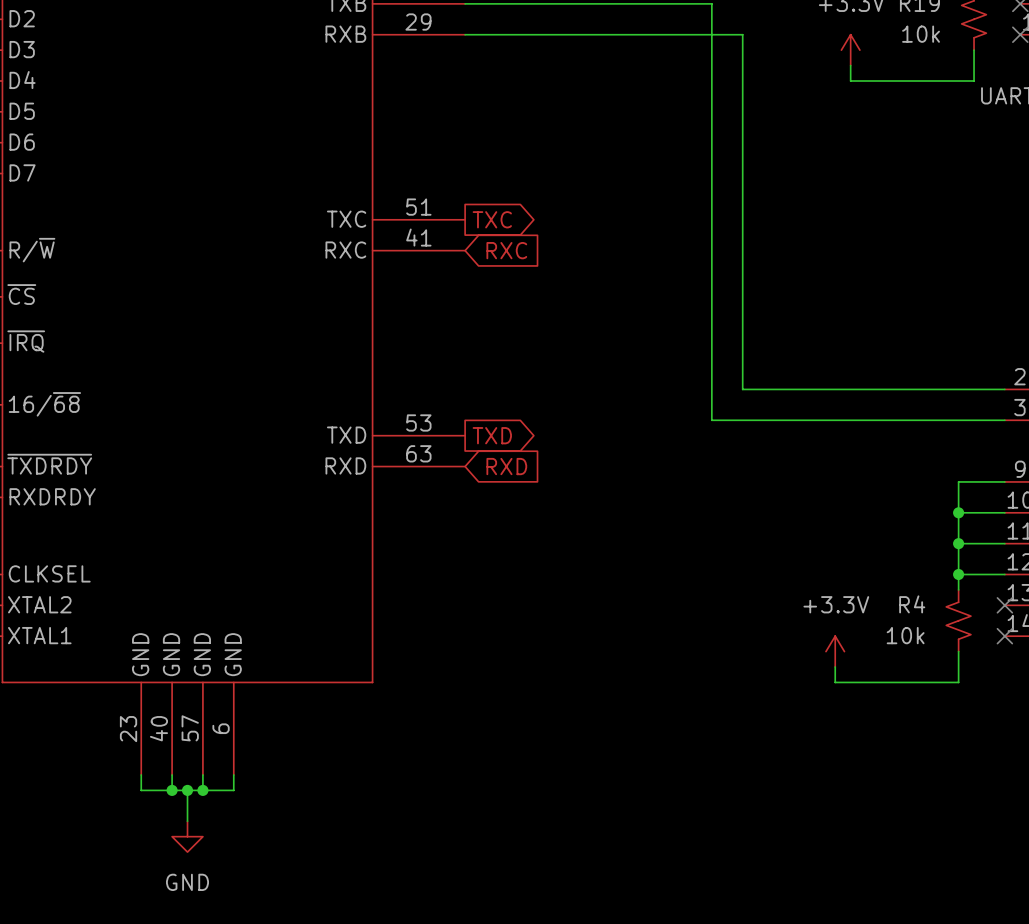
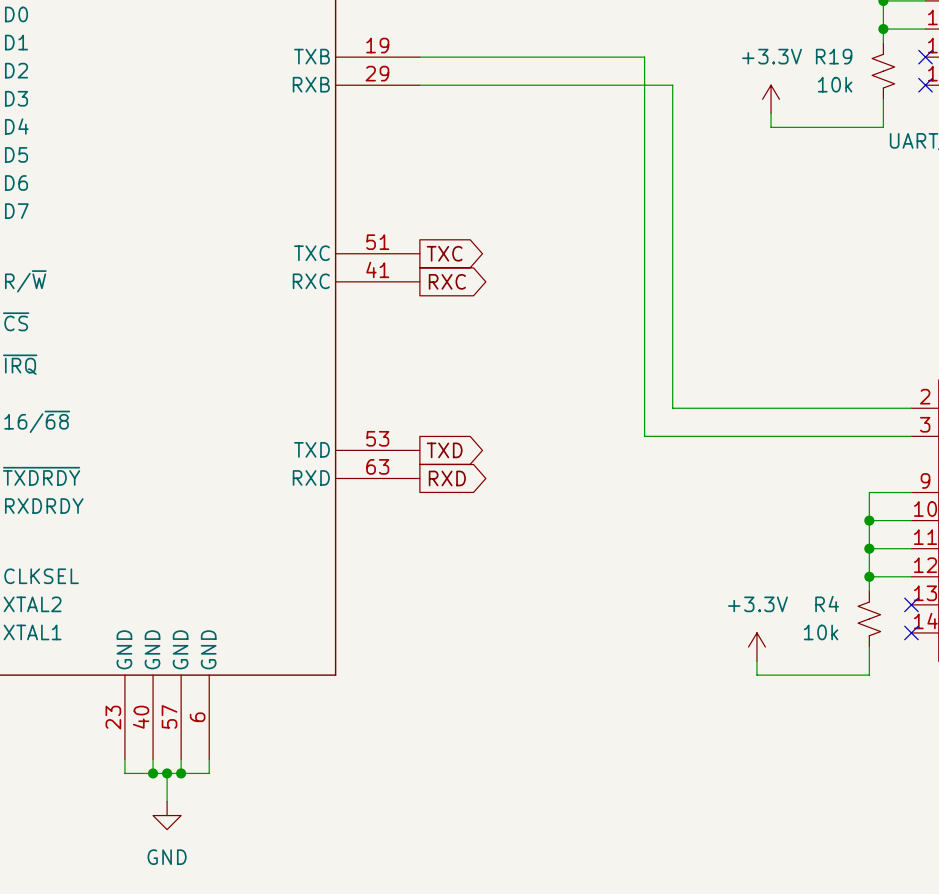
global label shape: input (506, 250) -> output (447, 281)
global label shape: input (506, 466) -> output (447, 478)

